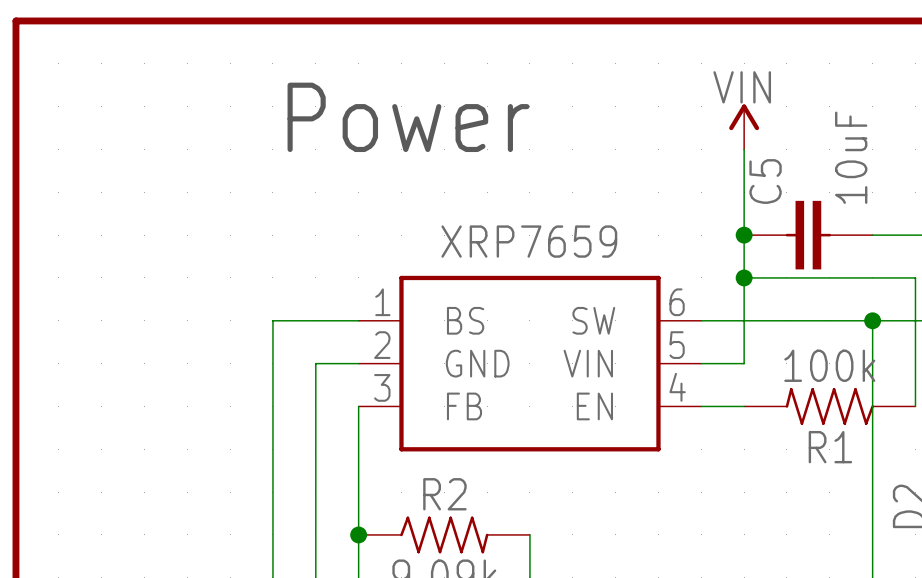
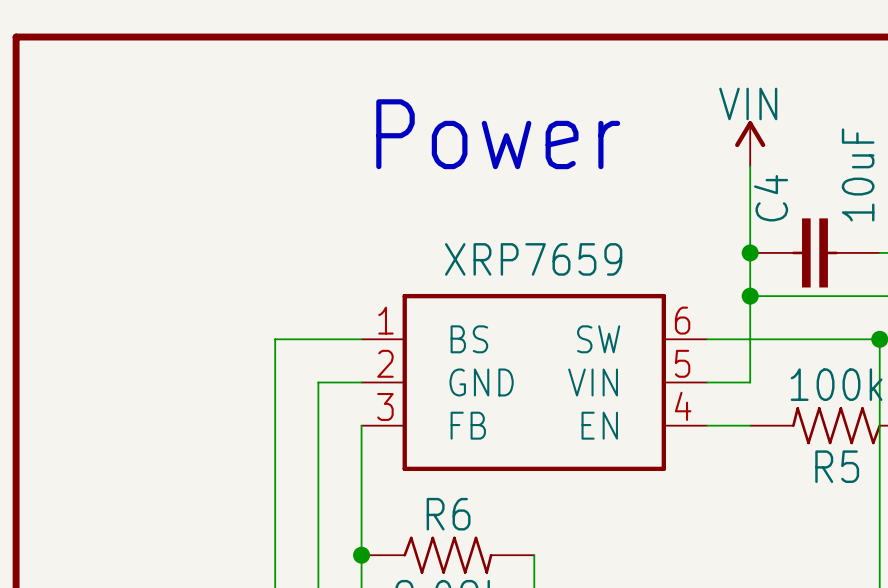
text position: Power (408, 117) -> Power (498, 134)
C5 name: C5 (765, 181) -> C4 (771, 198)
R1 name: R1 (830, 447) -> R5 (837, 466)
R2 name: R2 (444, 494) -> R6 (448, 514)

